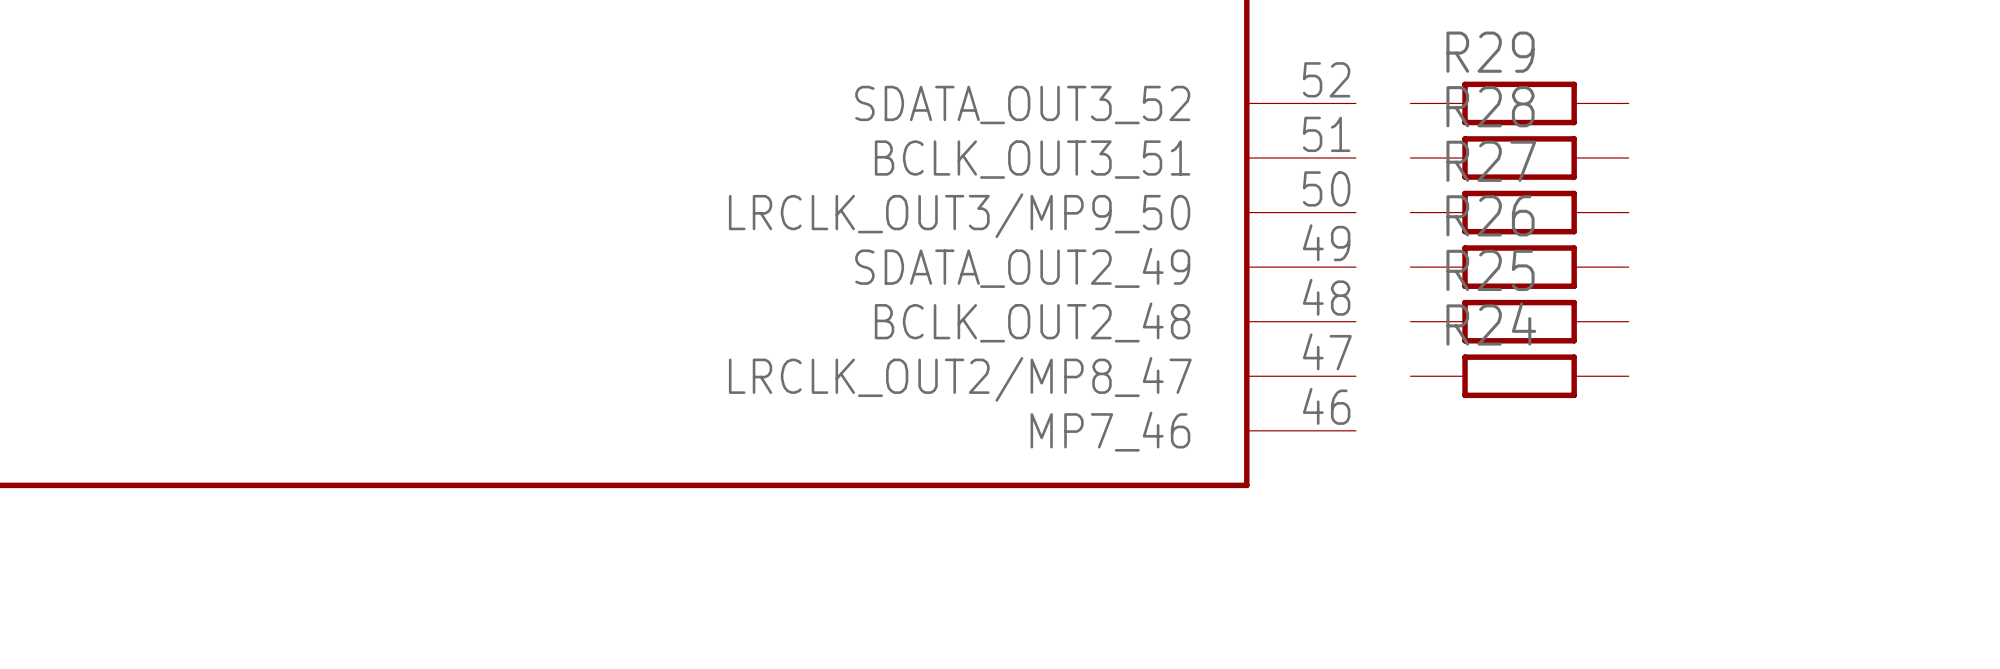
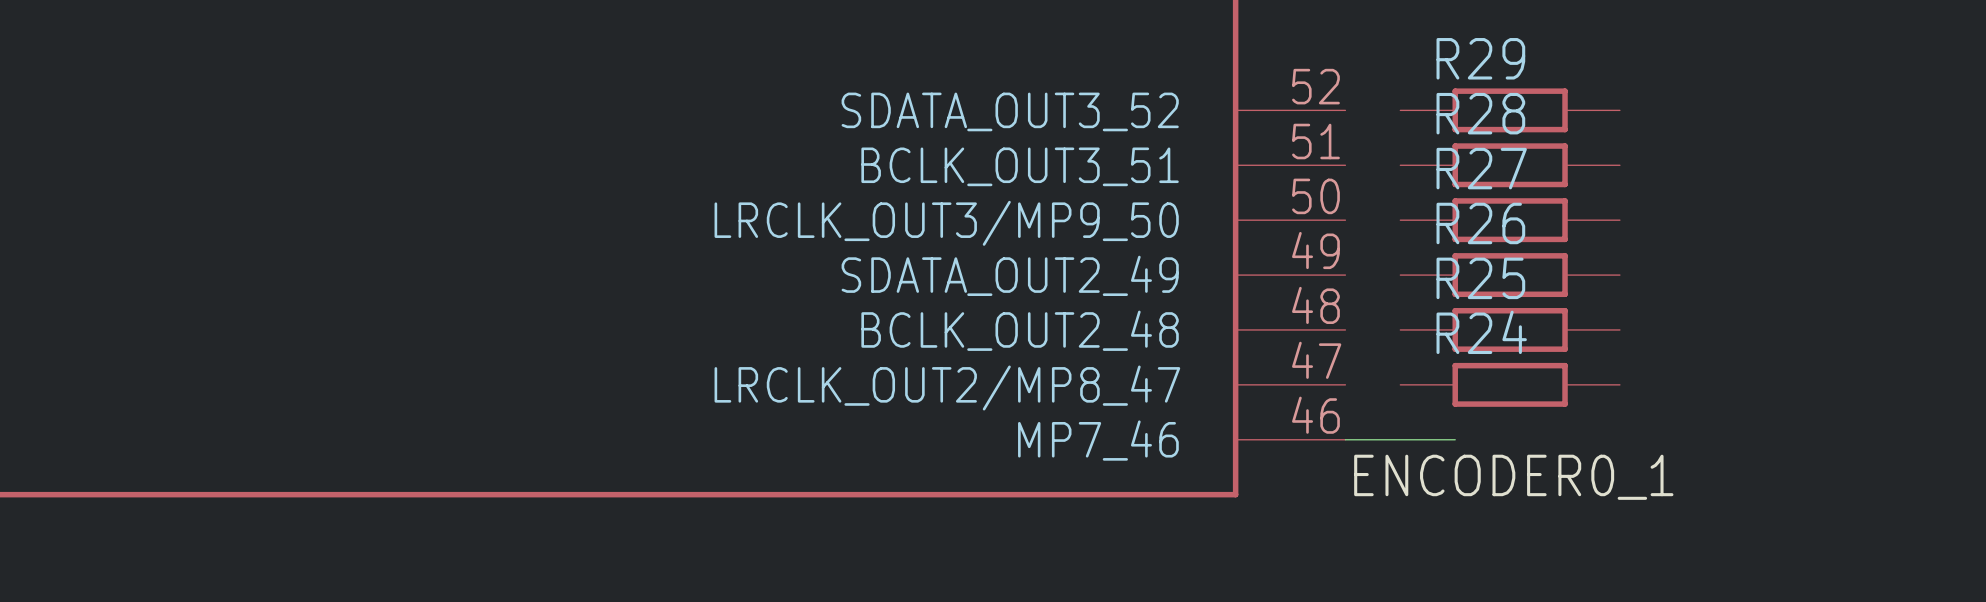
wire: none -> (1345, 439) (1455, 439)
label: none -> ENCODER0_1 (1513, 477)

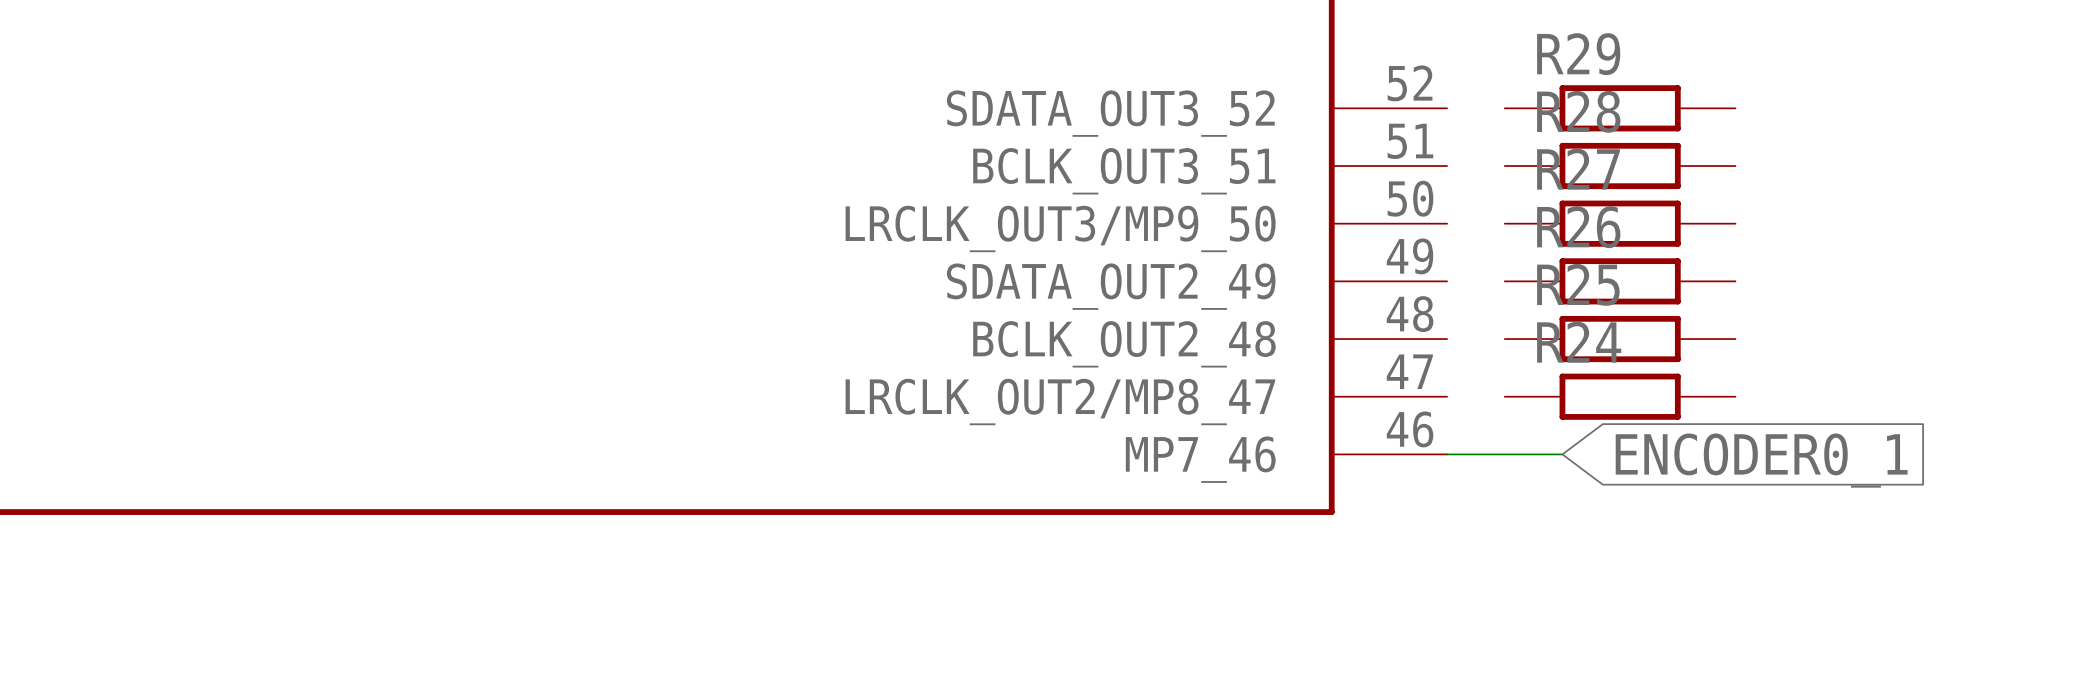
global label: none -> ENCODER0_1 (1761, 460)
label: ENCODER0_1 (1513, 477) -> none

